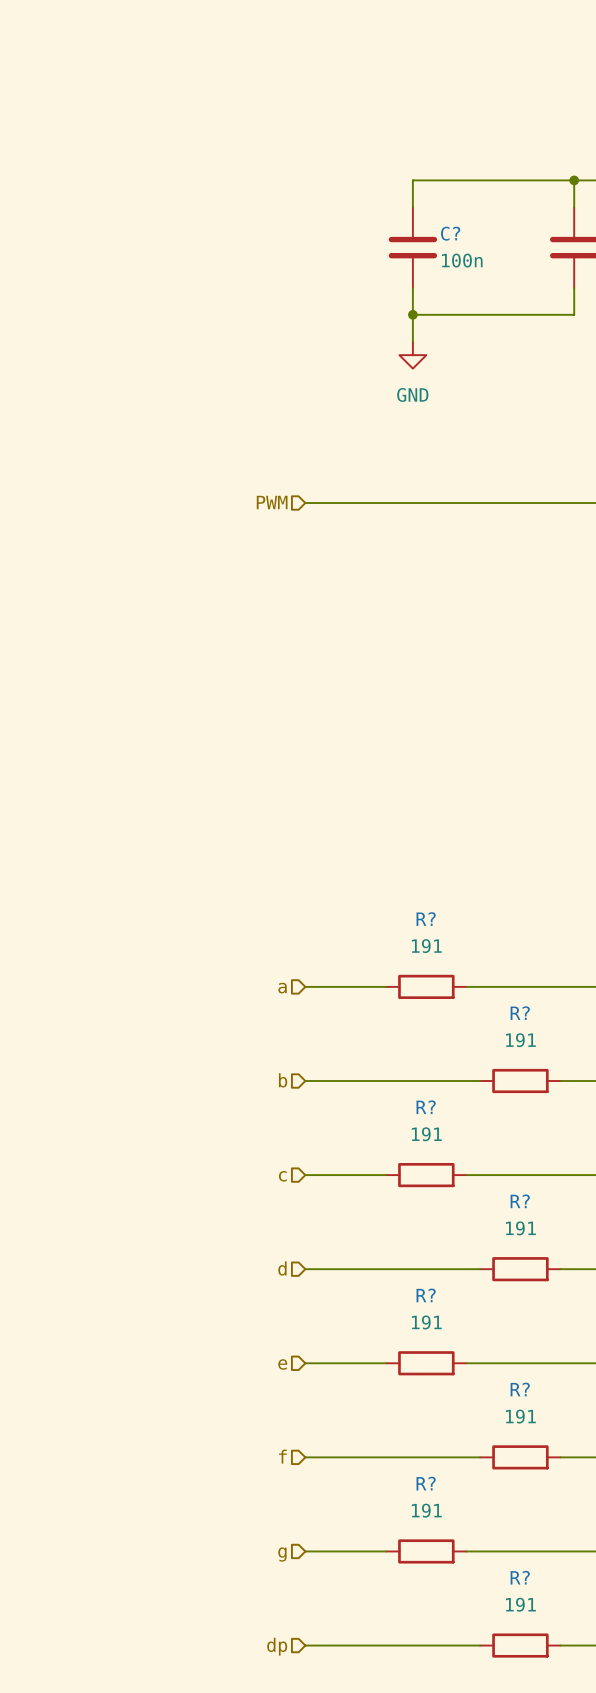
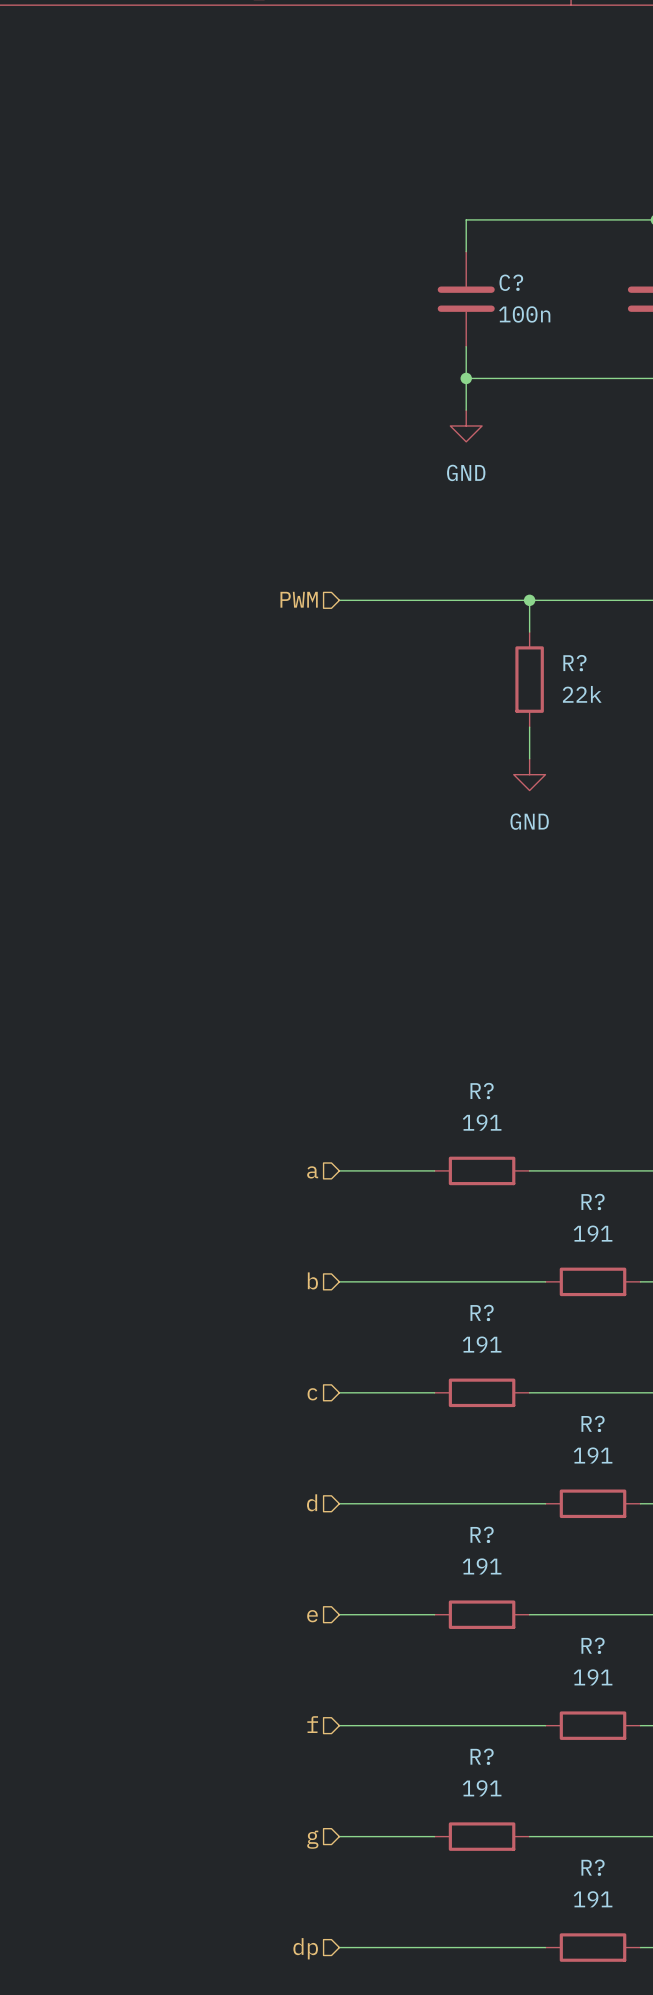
wire: none -> (529, 600) (529, 632)
junction: none -> (529, 600)
R?: none -> (529, 679)
wire: none -> (529, 727) (529, 758)
power symbol: none -> GND (529, 774)

